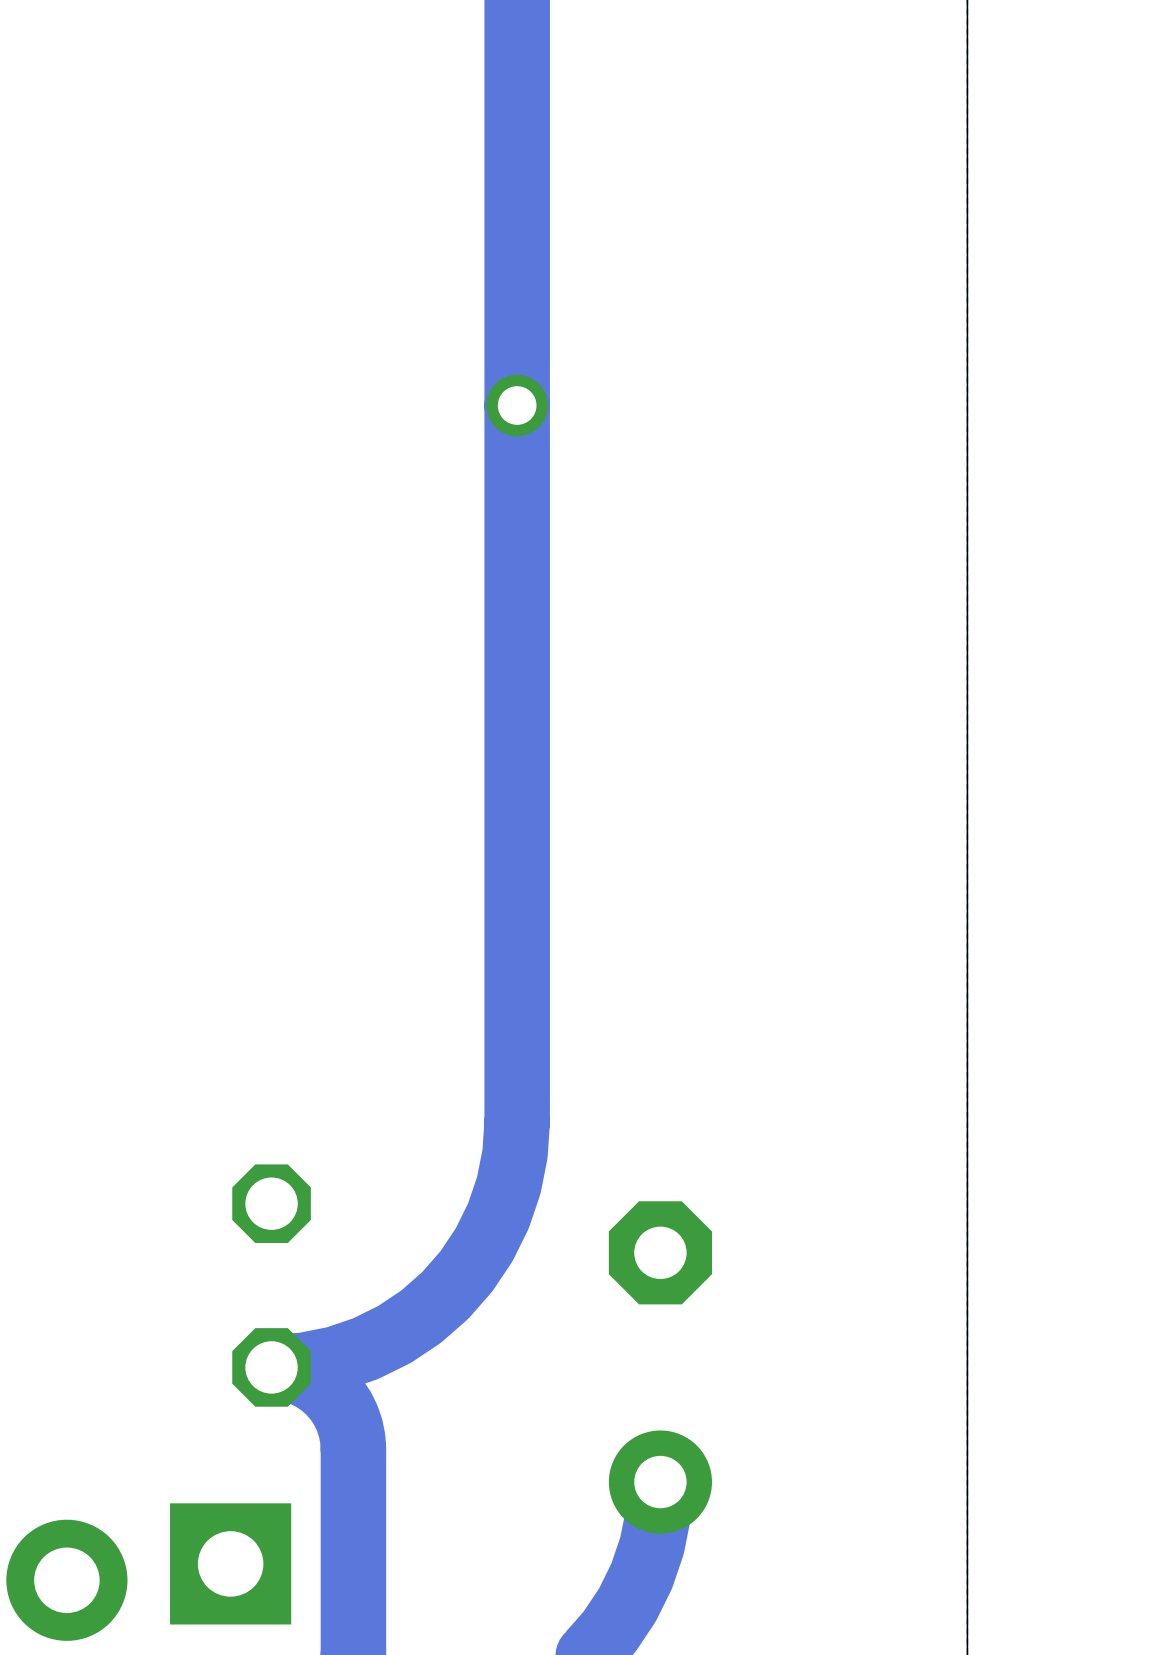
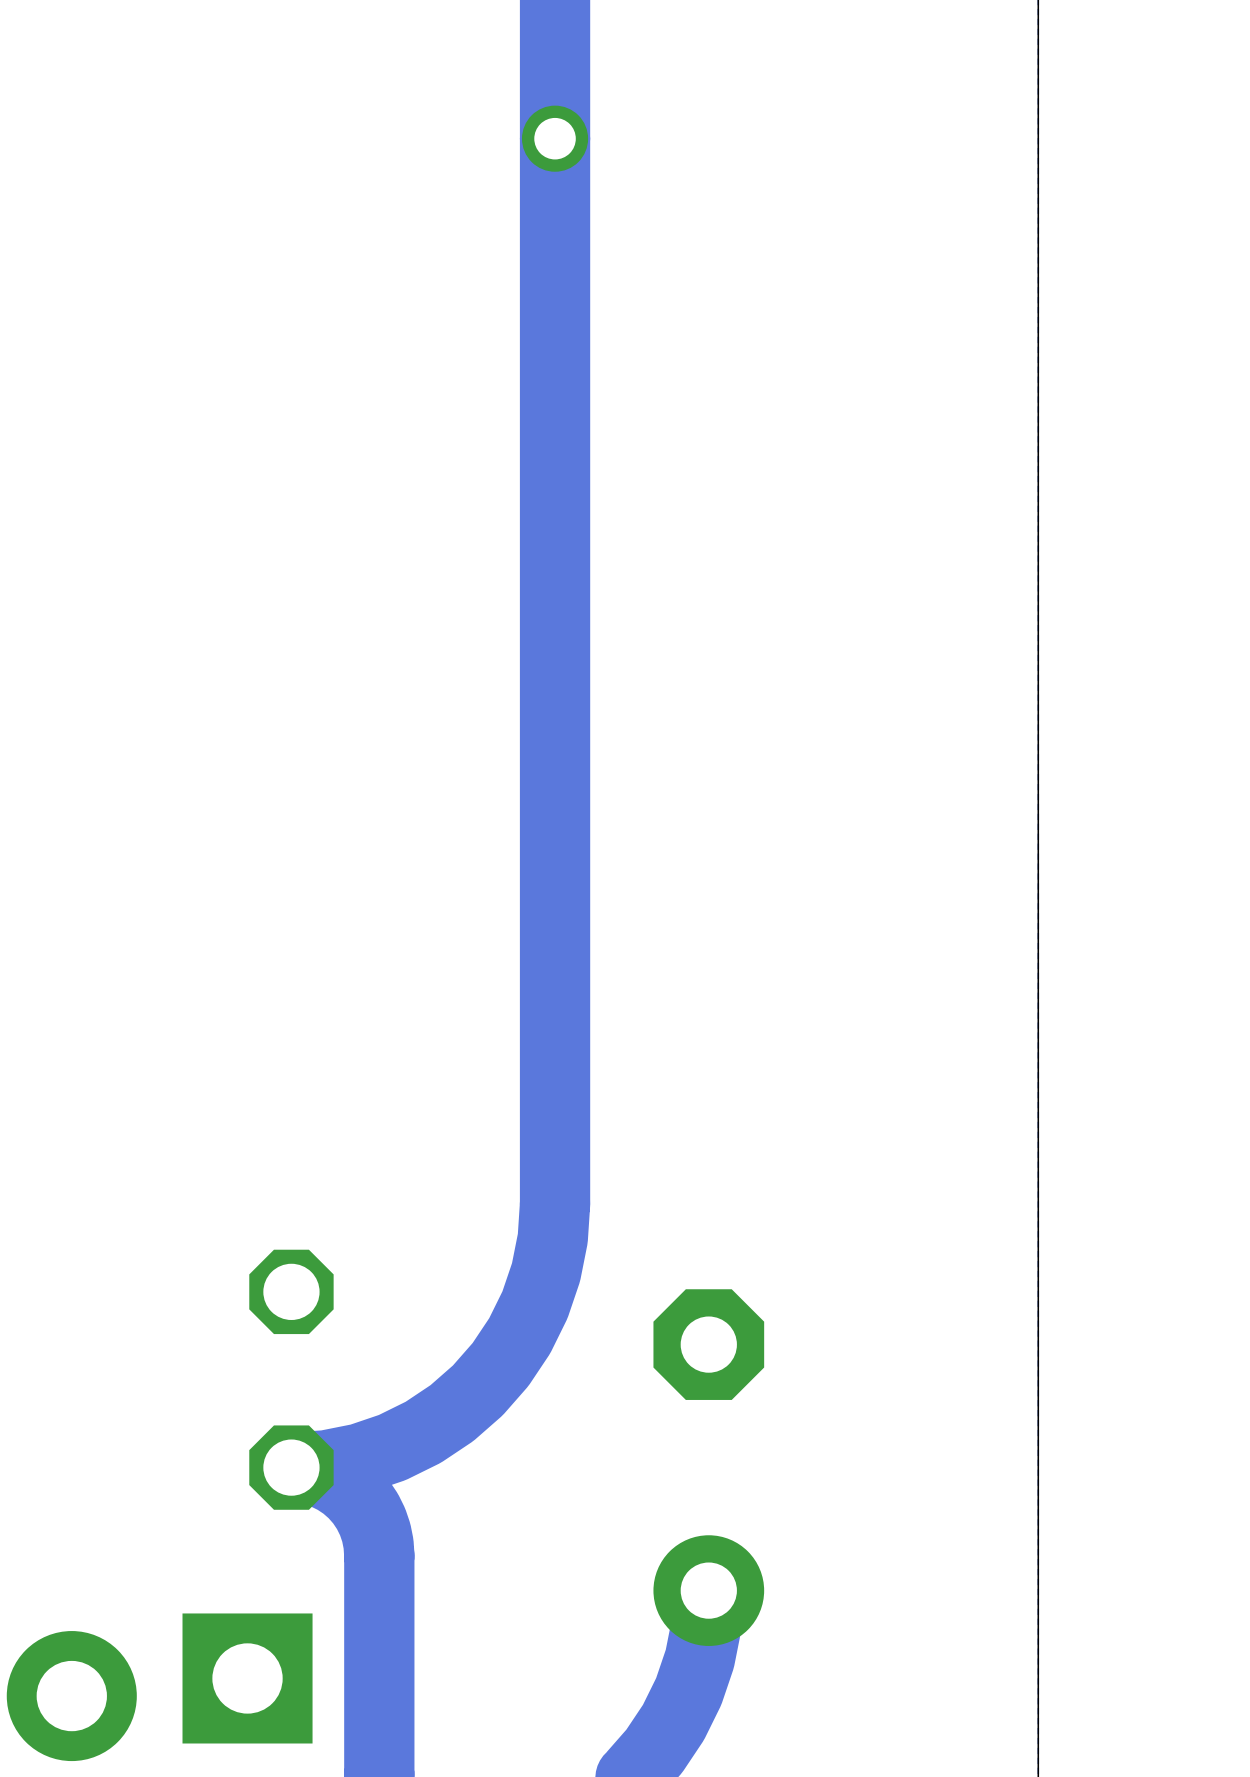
via position: (517, 405) -> (555, 138)

